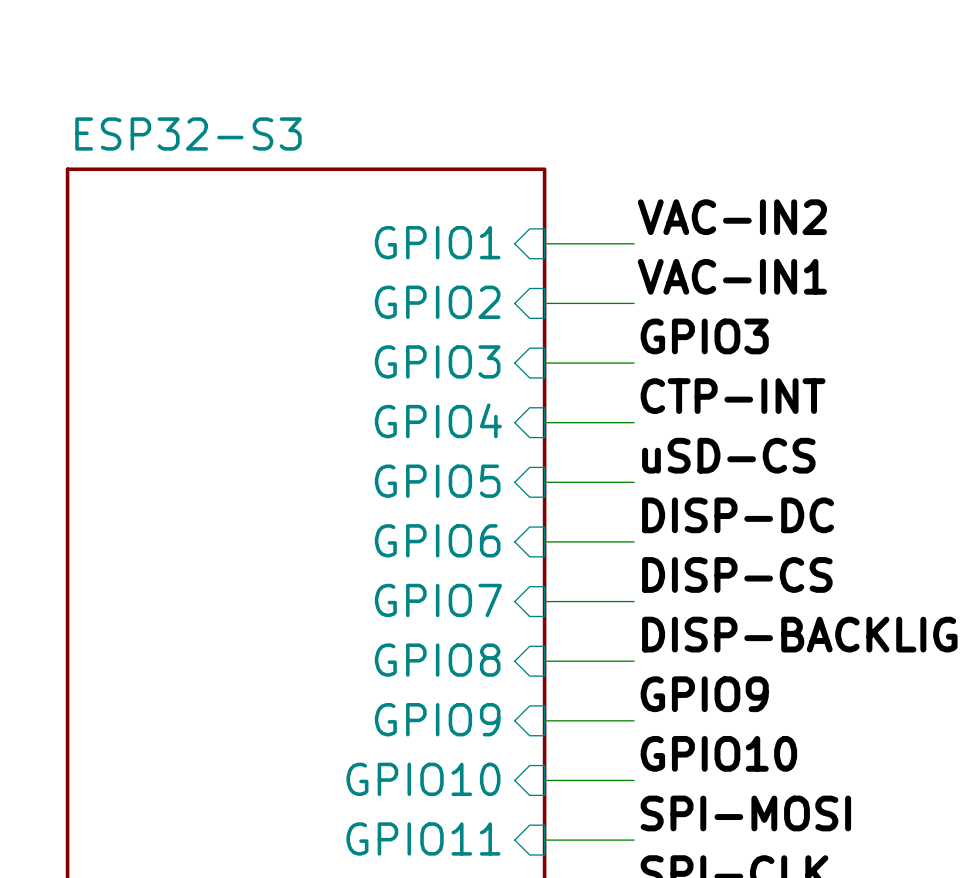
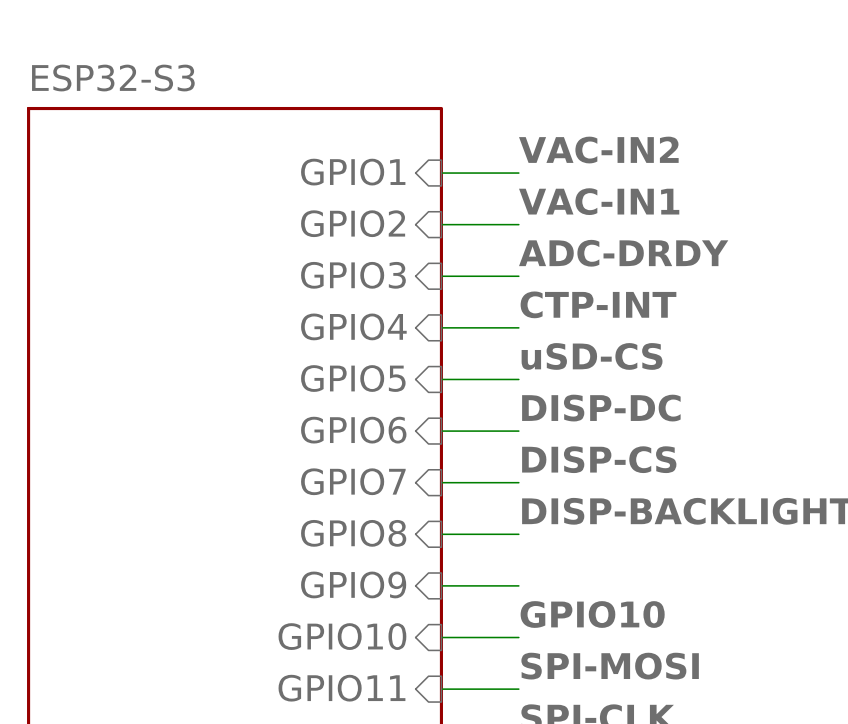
label: GPIO3 (704, 336) -> ADC-DRDY (623, 253)
label: GPIO9 (704, 694) -> none

